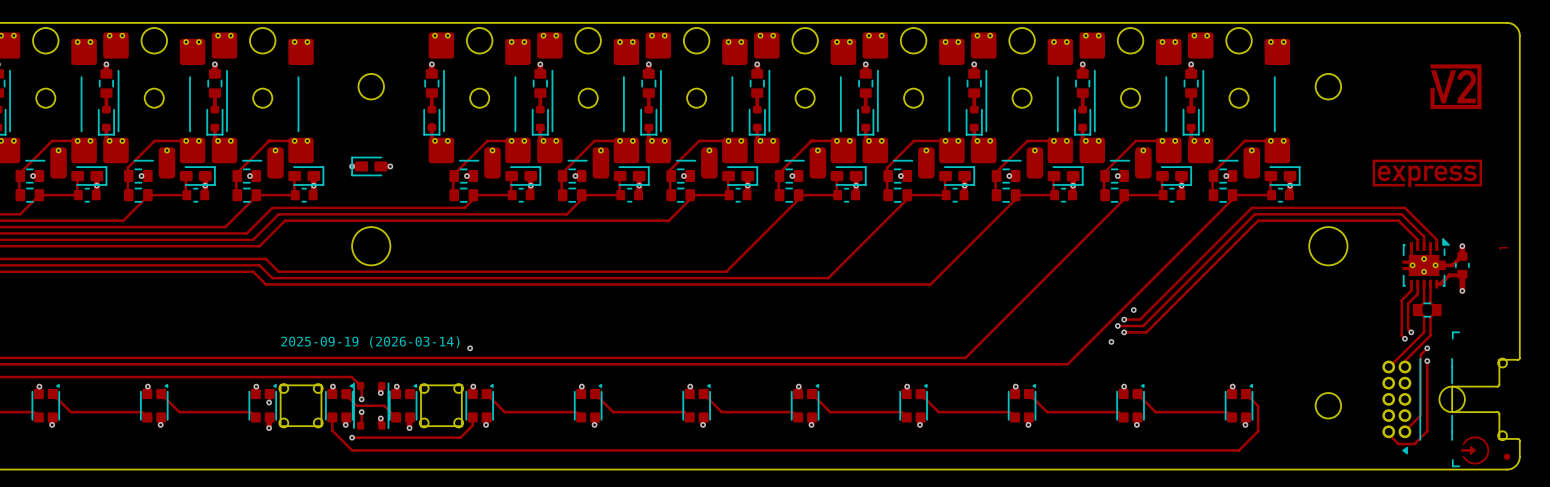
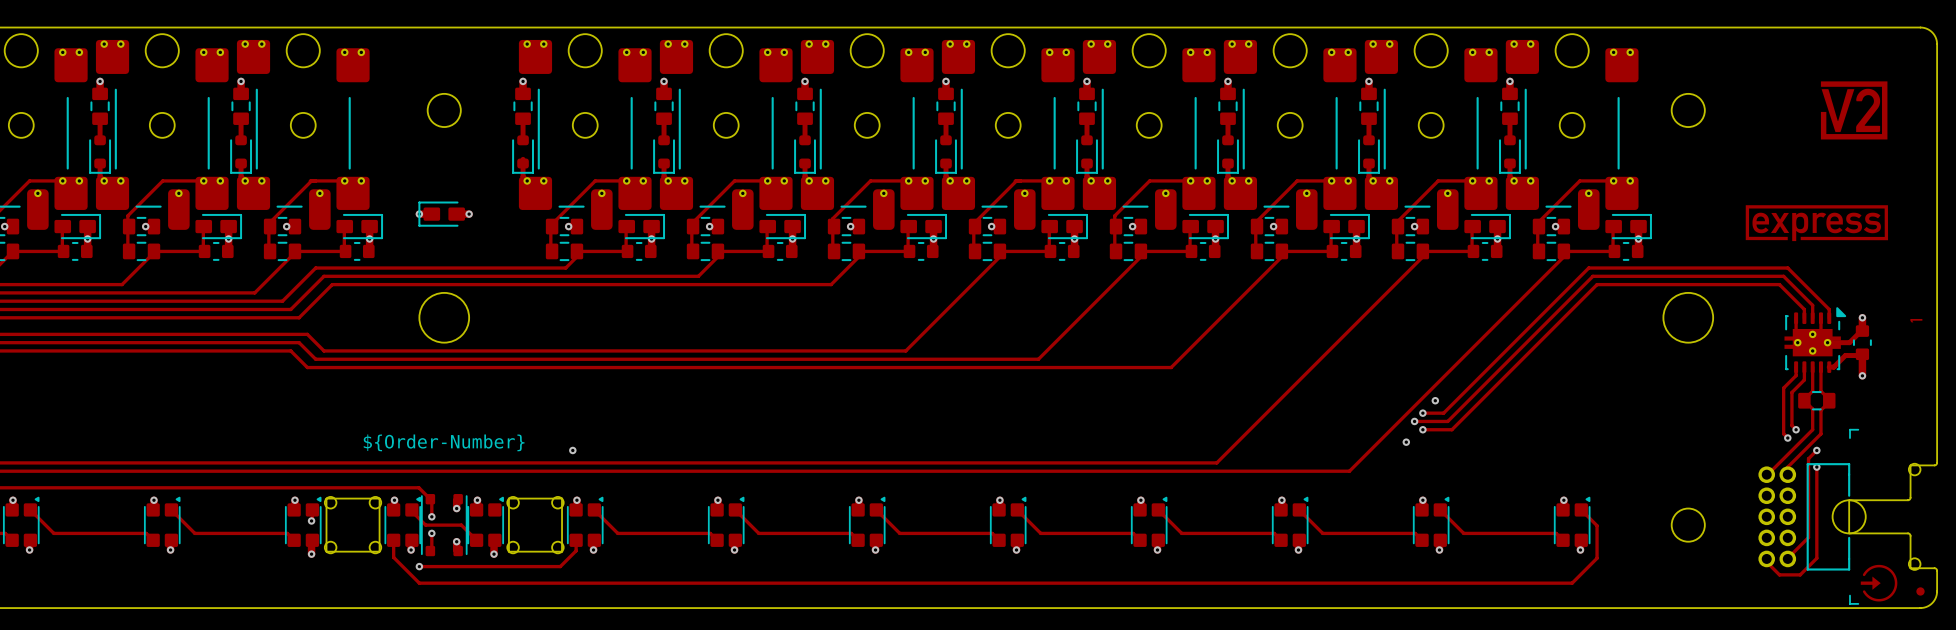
drawing shape: [281, 336, 460, 349] -> [363, 434, 525, 452]
part footprint: [1382, 358, 1453, 455] -> [1758, 463, 1851, 571]

